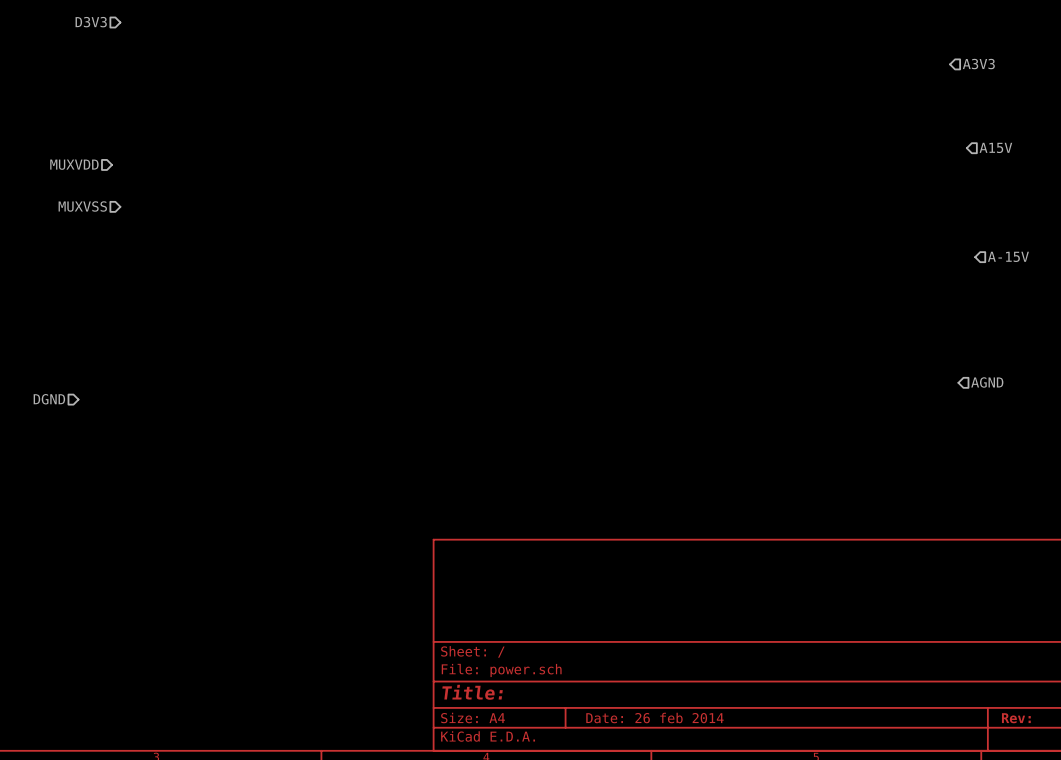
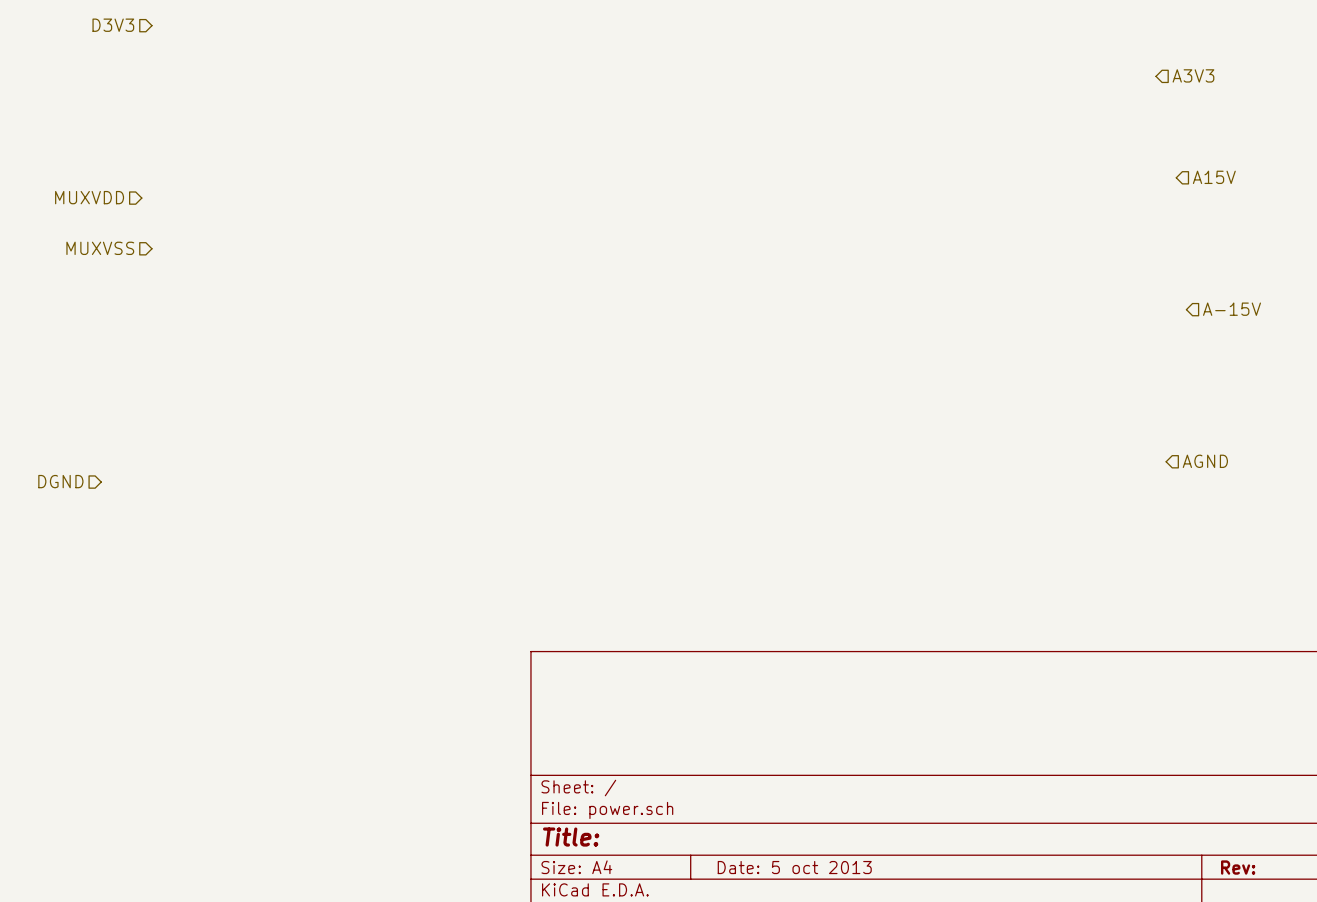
title block: Date: 26 feb 2014 (654, 718) -> Date: 5 oct 2013 (794, 867)

